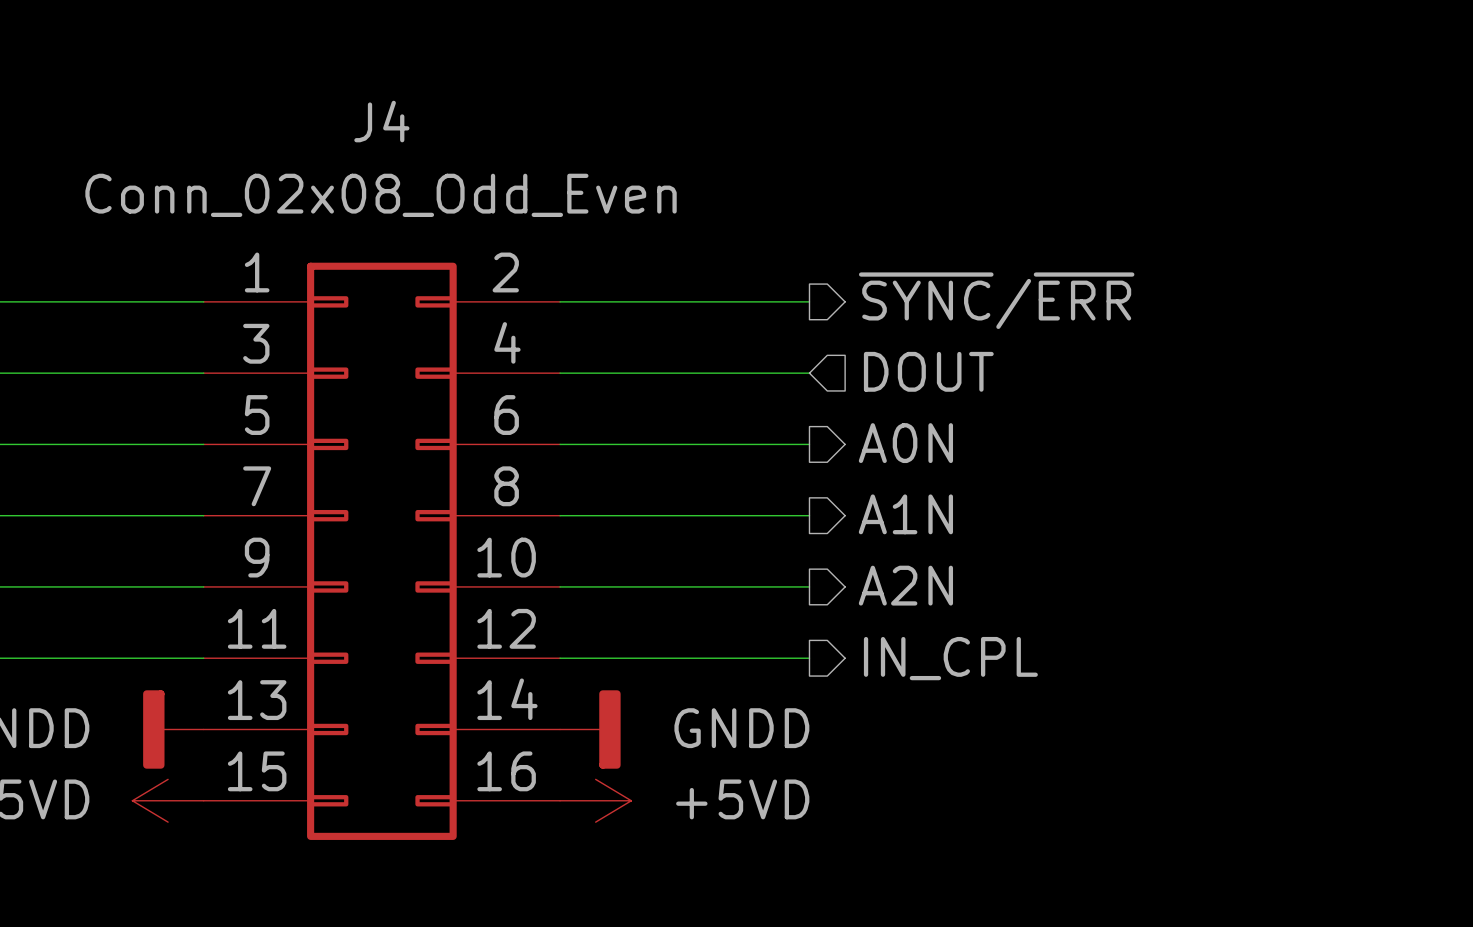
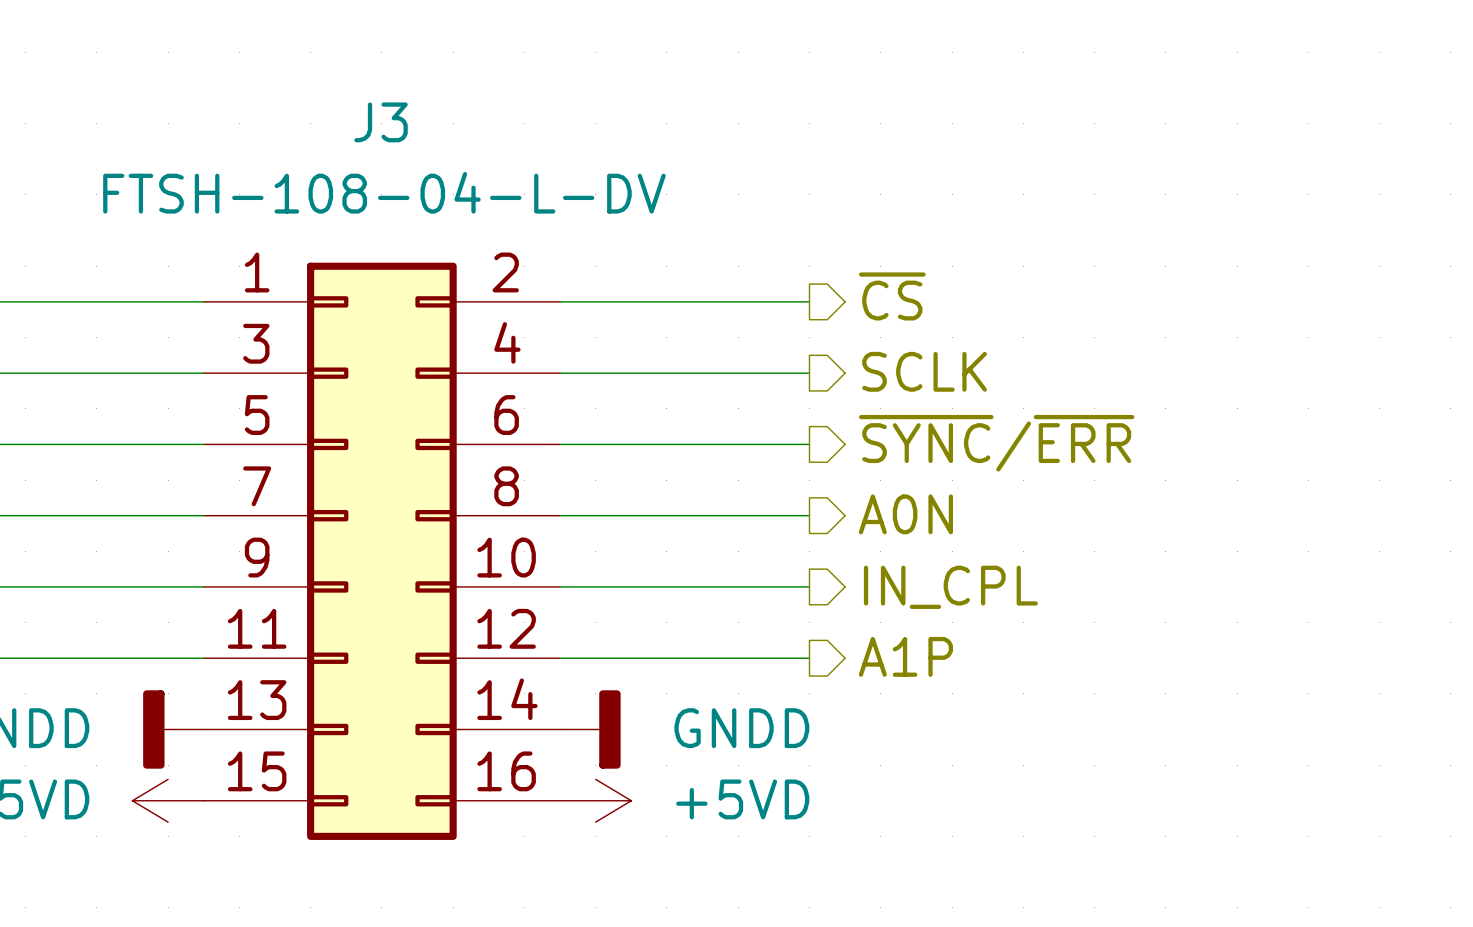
J4 name: J4 (381, 121) -> J3 (381, 122)
J4 value: Conn_02x08_Odd_Even (381, 195) -> FTSH-108-04-L-DV (384, 192)
hierarchical label: ~{SYNC}/~{ERR} (996, 300) -> ~{CS} (892, 296)
hierarchical label shape: input (928, 371) -> output (924, 371)
hierarchical label: DOUT (928, 371) -> SCLK (924, 371)
hierarchical label: A0N (905, 443) -> ~{SYNC}/~{ERR} (996, 443)
hierarchical label: A1N (905, 514) -> A0N (905, 514)
hierarchical label: A2N (905, 585) -> IN_CPL (950, 587)
hierarchical label: IN_CPL (950, 658) -> A1P (905, 656)

